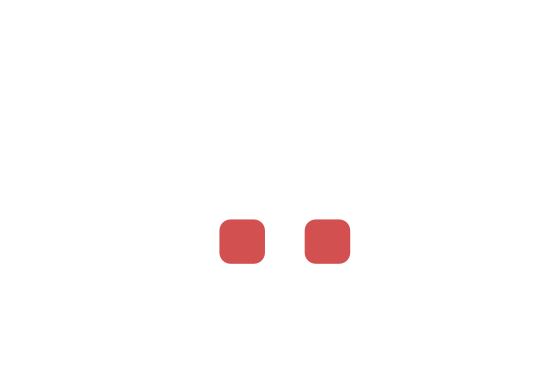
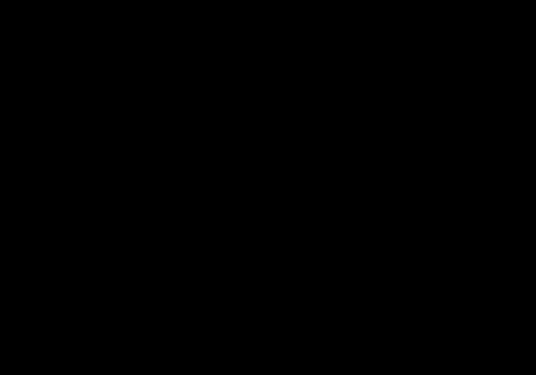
part: (284, 241) -> none

